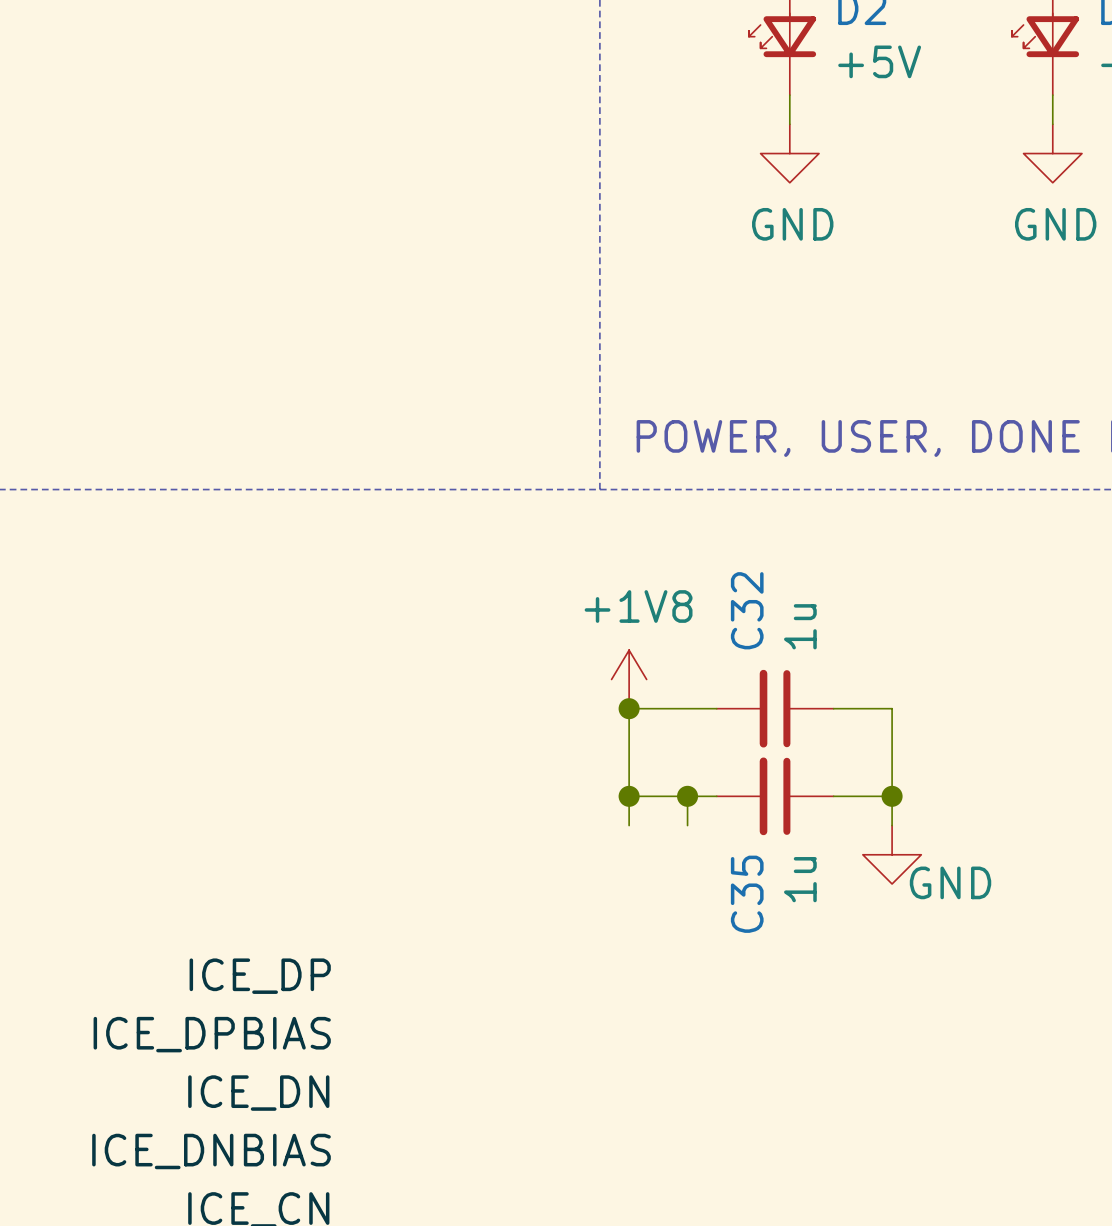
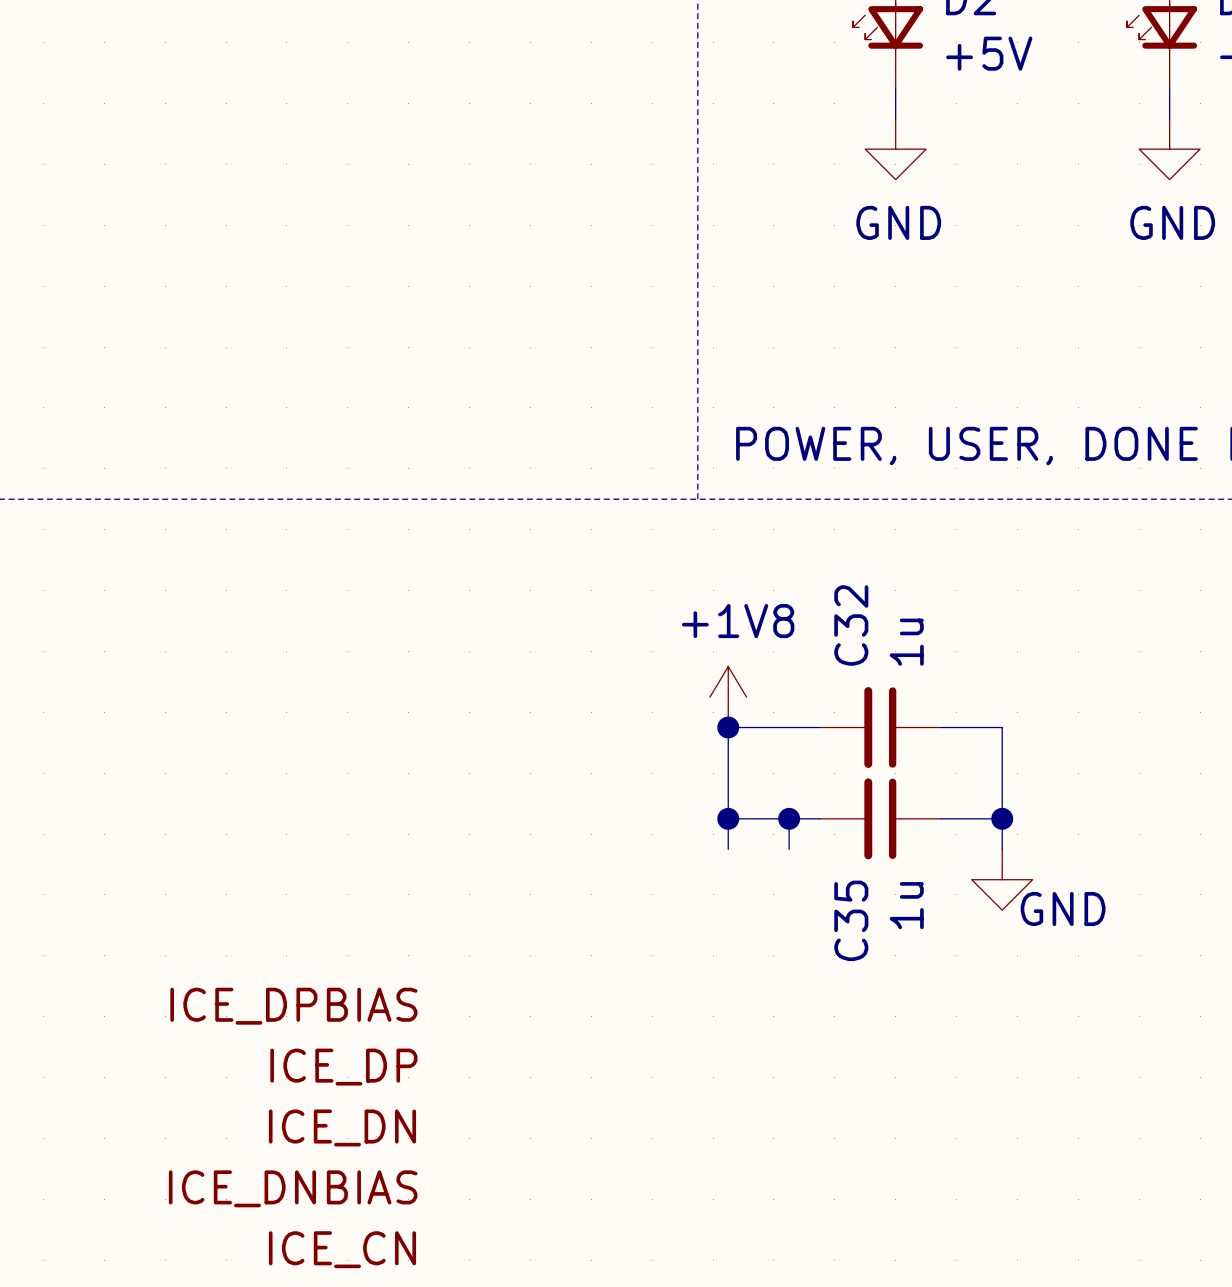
label: ICE_DP (260, 976) -> ICE_DPBIAS (293, 1006)
label: ICE_DPBIAS (212, 1034) -> ICE_DP (343, 1067)

